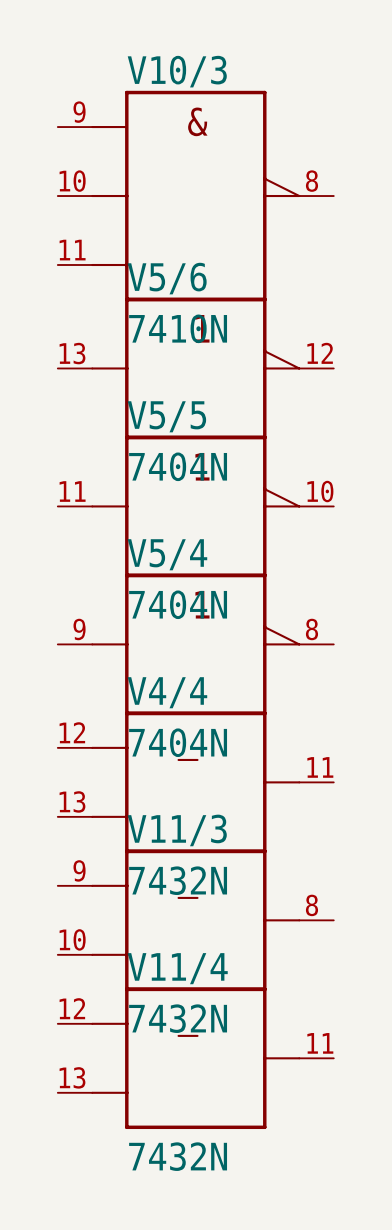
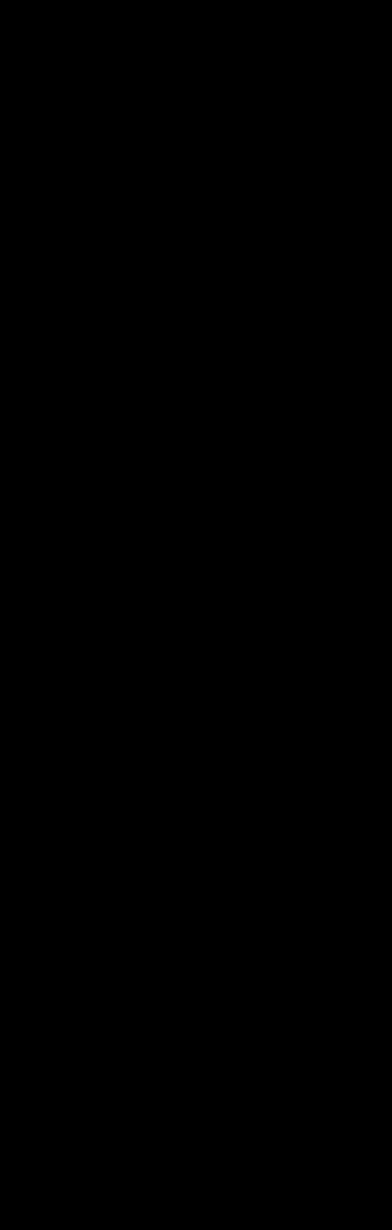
V10/3: 7410N (195, 196) -> none
V5/6: 7404N (195, 368) -> none
V5/5: 7404N (195, 506) -> none
V5/4: 7404N (195, 644) -> none
V4/4: 7432N (195, 782) -> none
V11/3: 7432N (195, 920) -> none
V11/4: 7432N (195, 1058) -> none

